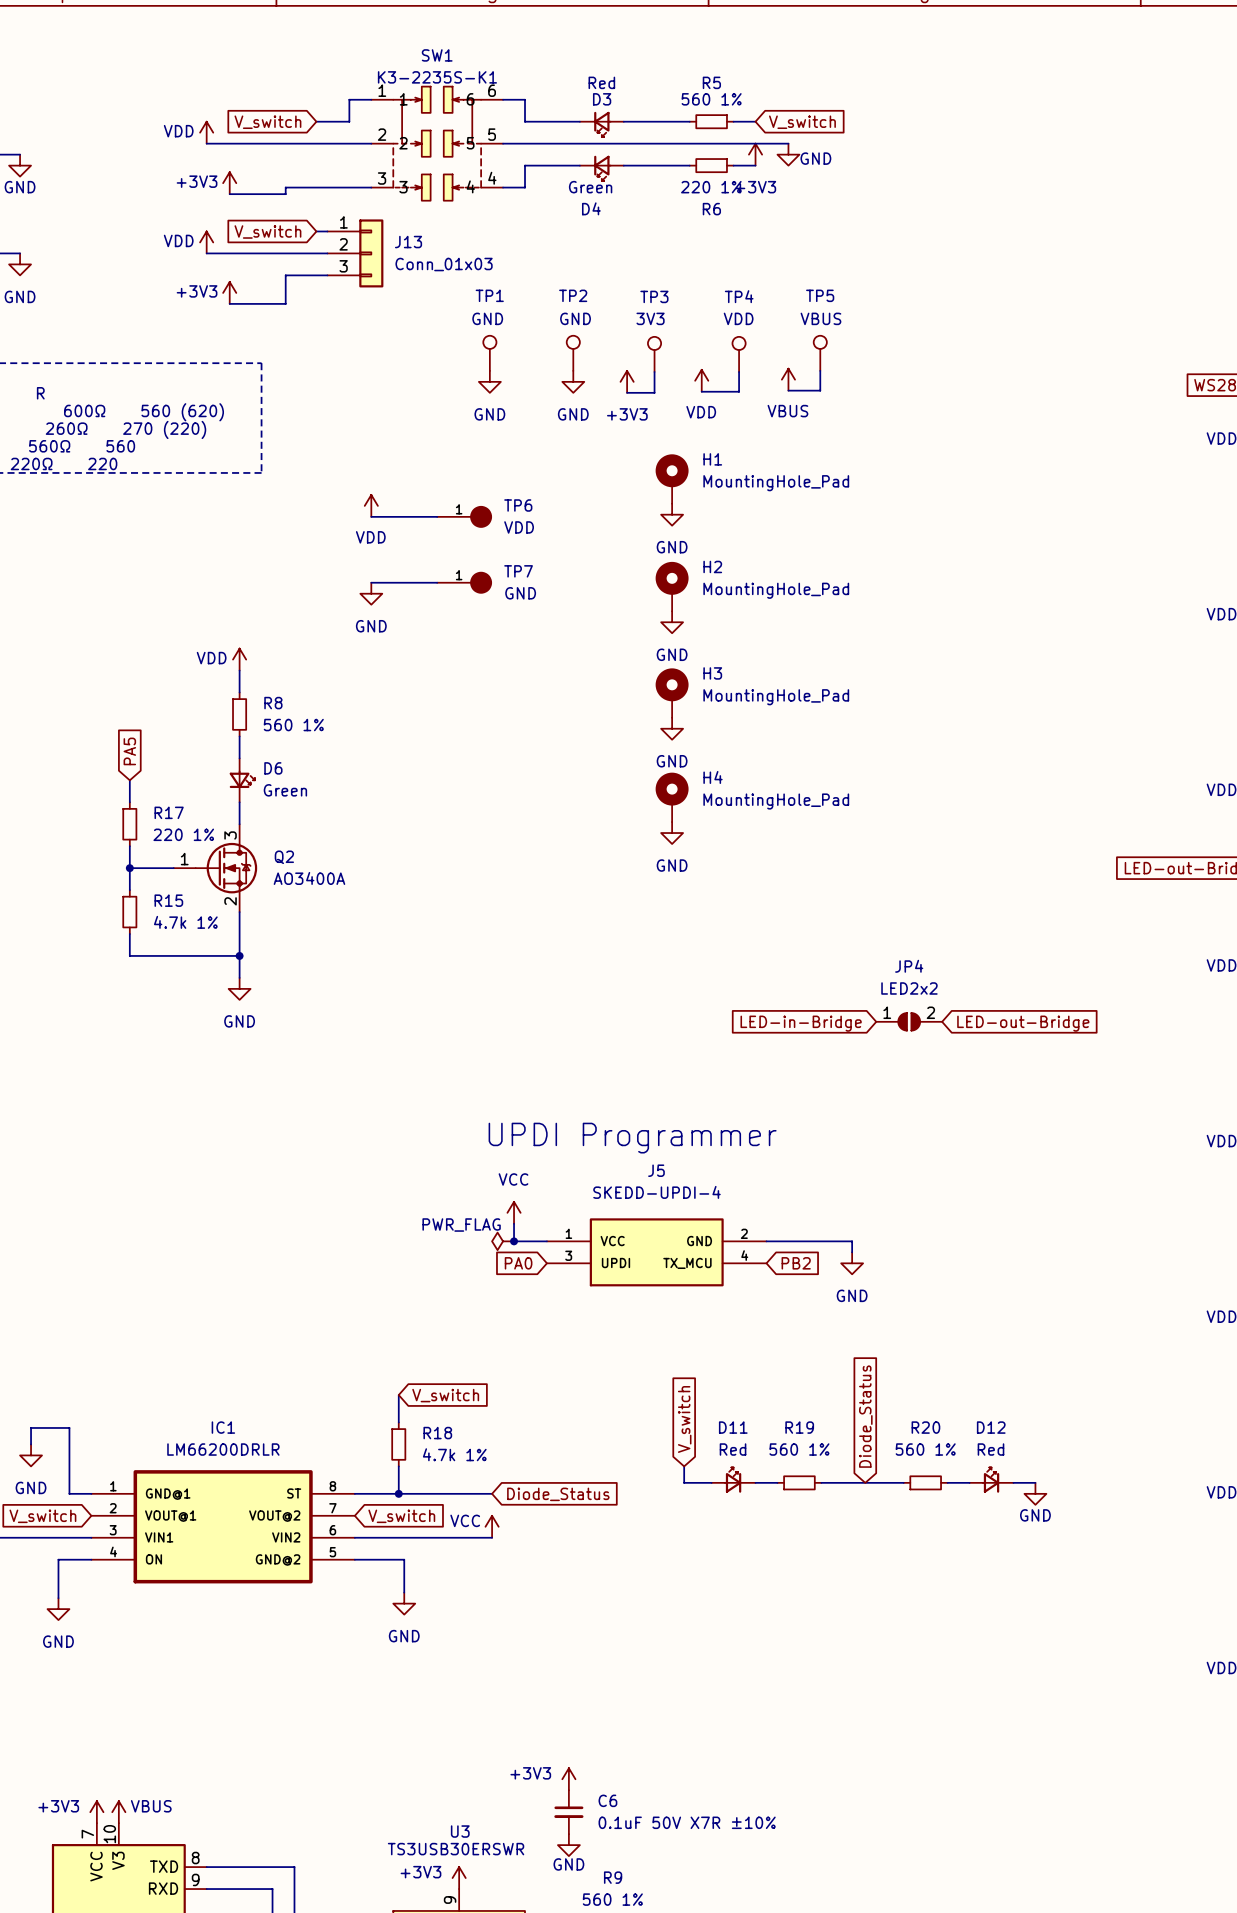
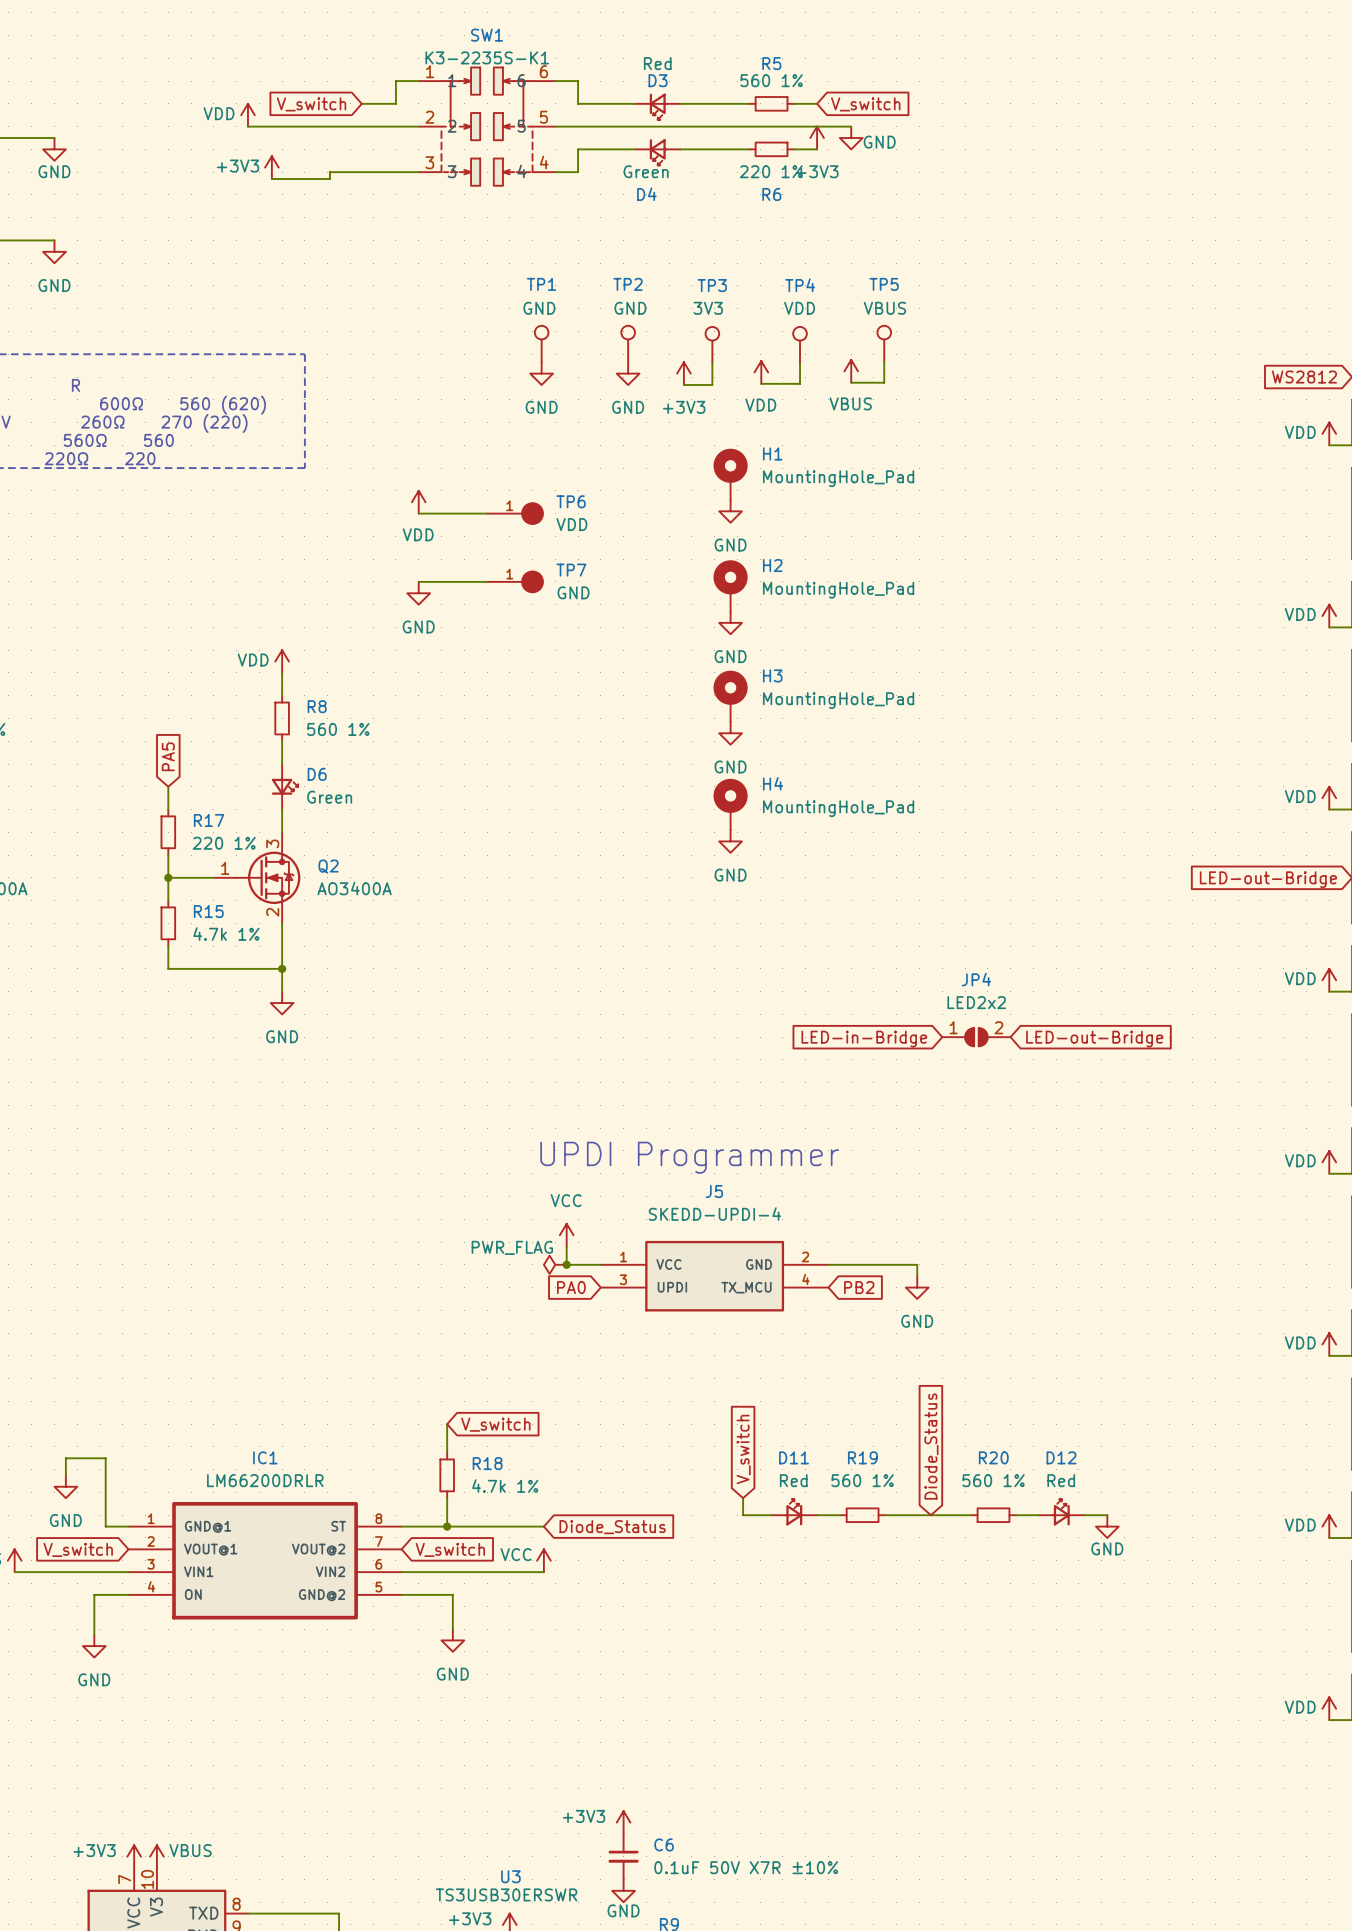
global label: V_switch (267, 231) -> none
wire: (316, 231) (327, 231) -> none
power symbol: VDD (206, 242) -> none
wire: (206, 253) (327, 253) -> none
J13: Conn_01x03 (355, 253) -> none
wire: (327, 275) (285, 275) (285, 303) (229, 303) -> none
power symbol: +3V3 (229, 292) -> none

